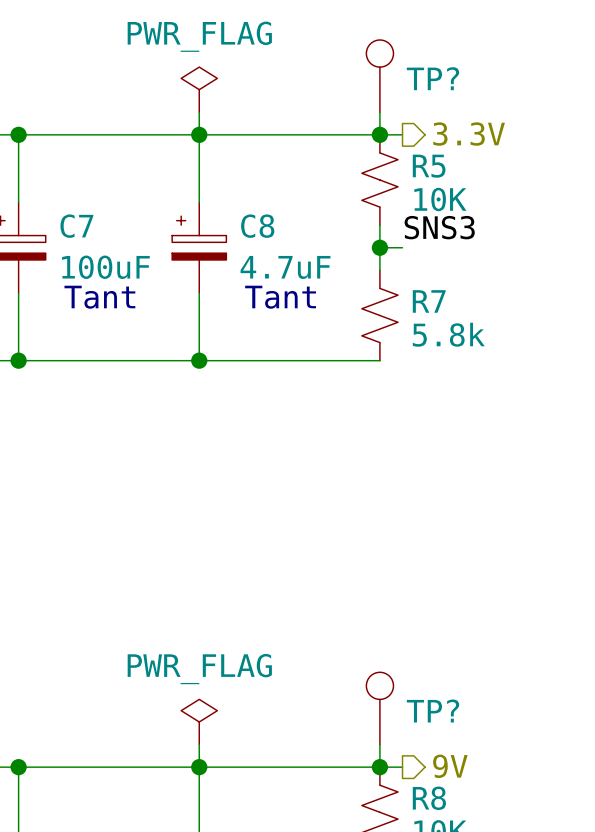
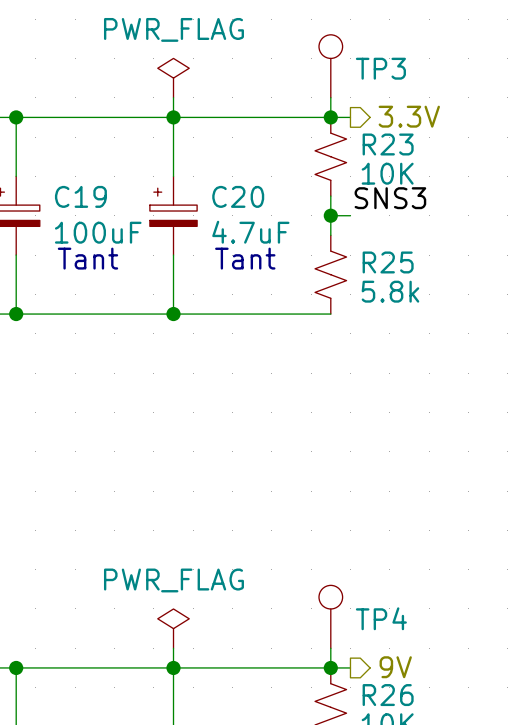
TP? name: TP? (432, 78) -> TP3 (380, 68)
R5 name: R5 (429, 166) -> R23 (388, 144)
C7 name: C7 (76, 226) -> C19 (80, 196)
C8 name: C8 (257, 226) -> C20 (238, 196)
R7 name: R7 (429, 301) -> R25 (388, 262)
TP? name: TP? (432, 711) -> TP4 (381, 618)
R8 name: R8 (429, 798) -> R26 (388, 695)

